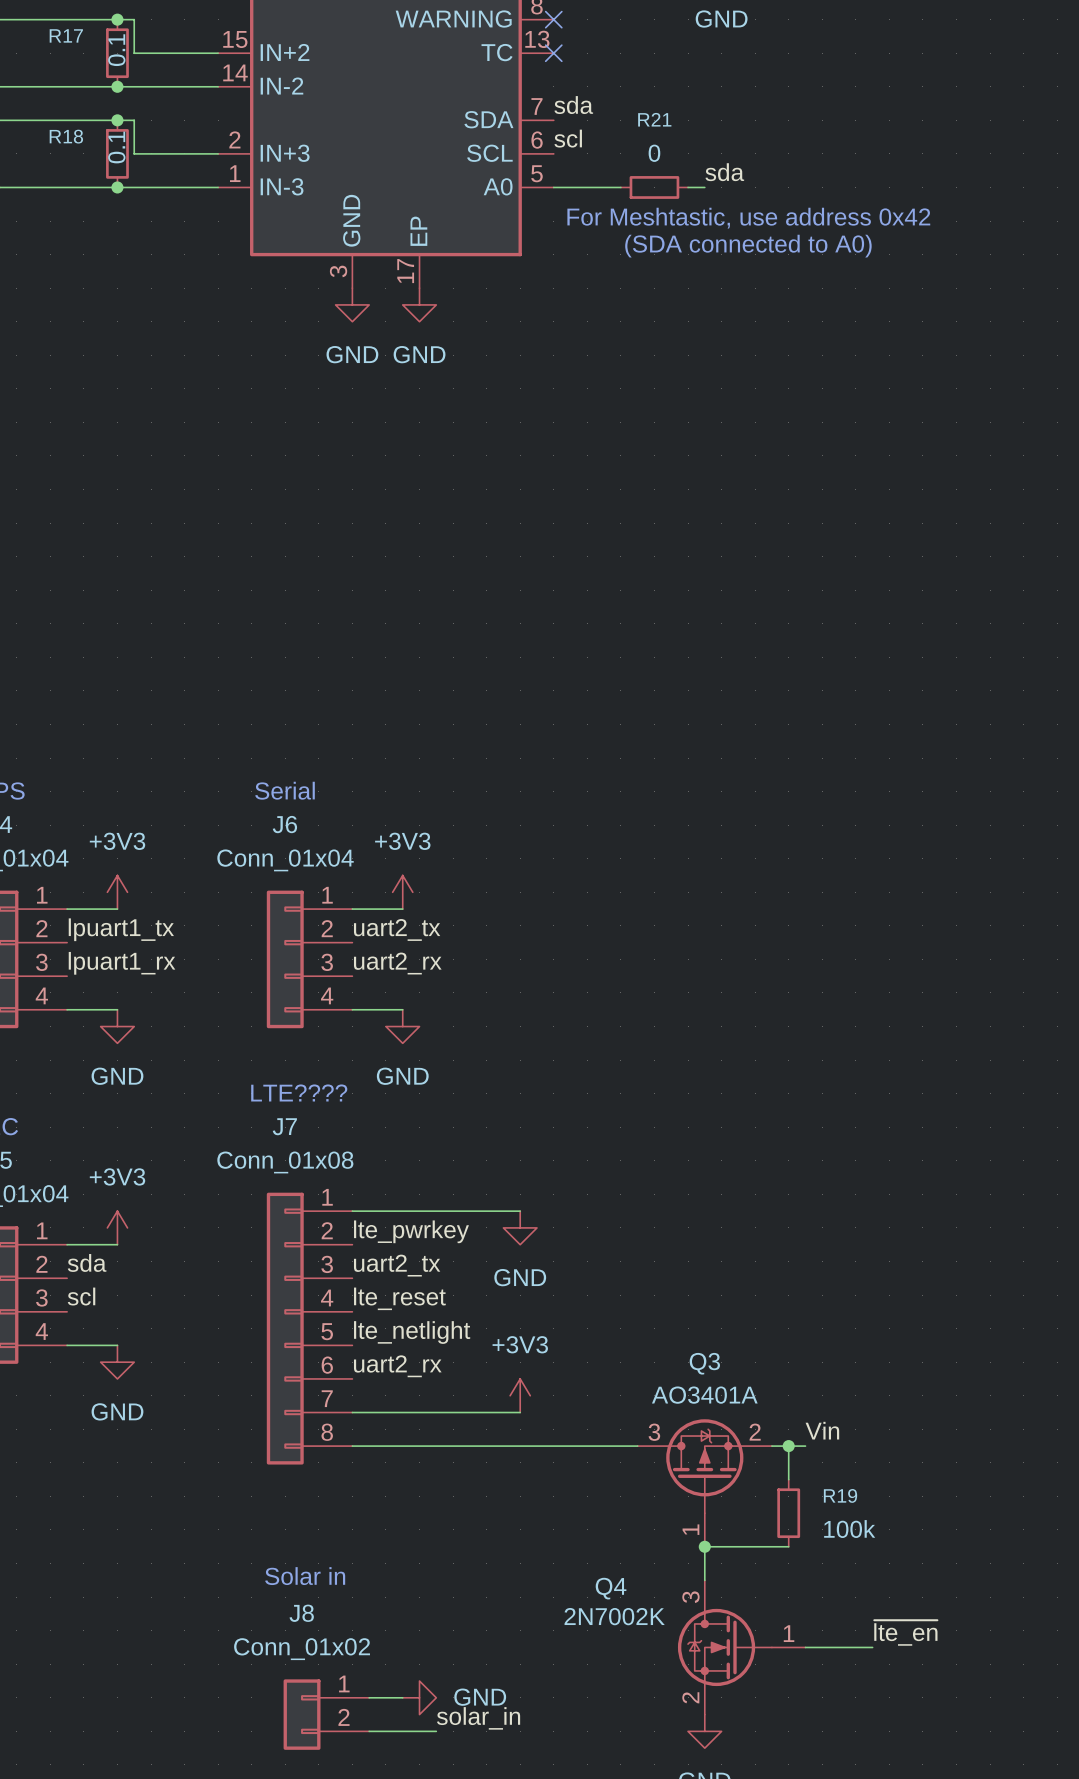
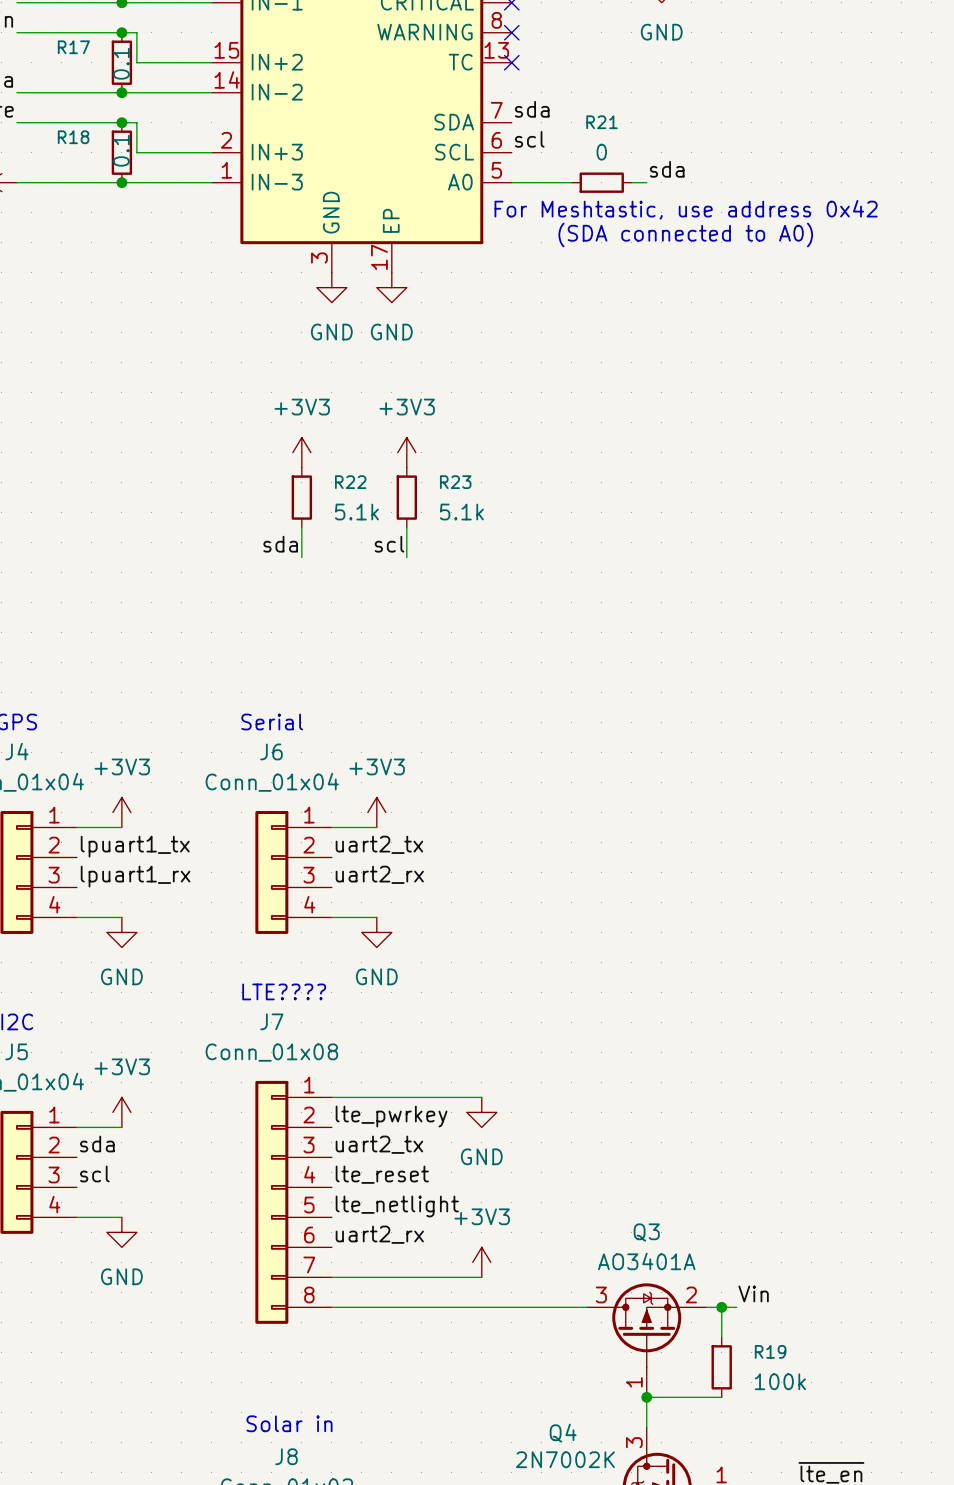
power symbol: none -> +3V3 (301, 452)
power symbol: none -> +3V3 (406, 452)
R22: none -> 5.1k (301, 497)
R23: none -> 5.1k (406, 497)
wire: none -> (301, 527) (301, 557)
wire: none -> (406, 527) (406, 557)
label: none -> sda (280, 544)
label: none -> scl (389, 544)

